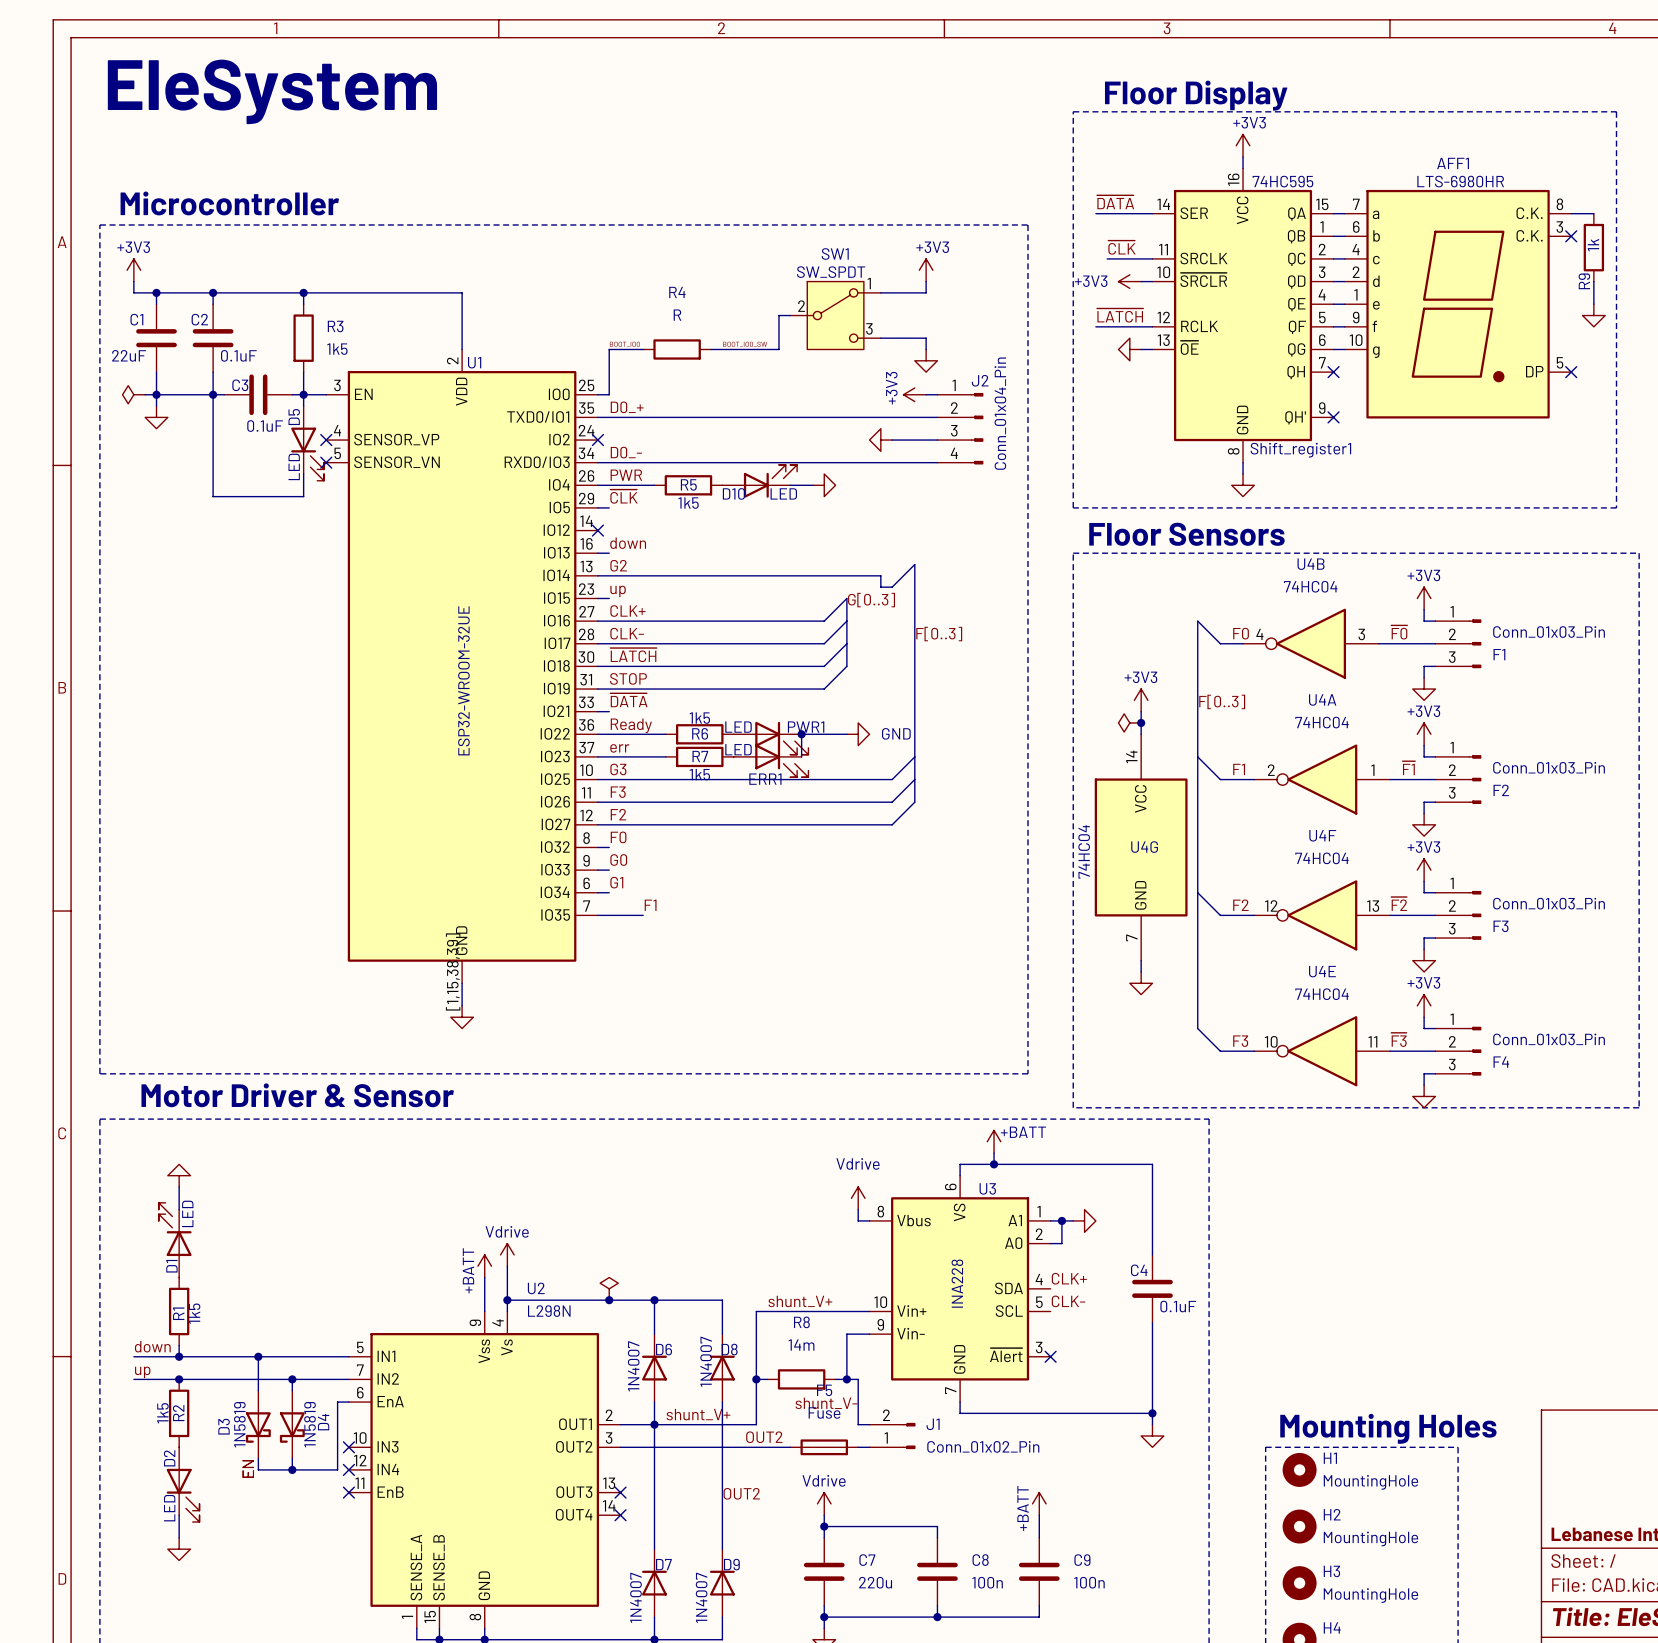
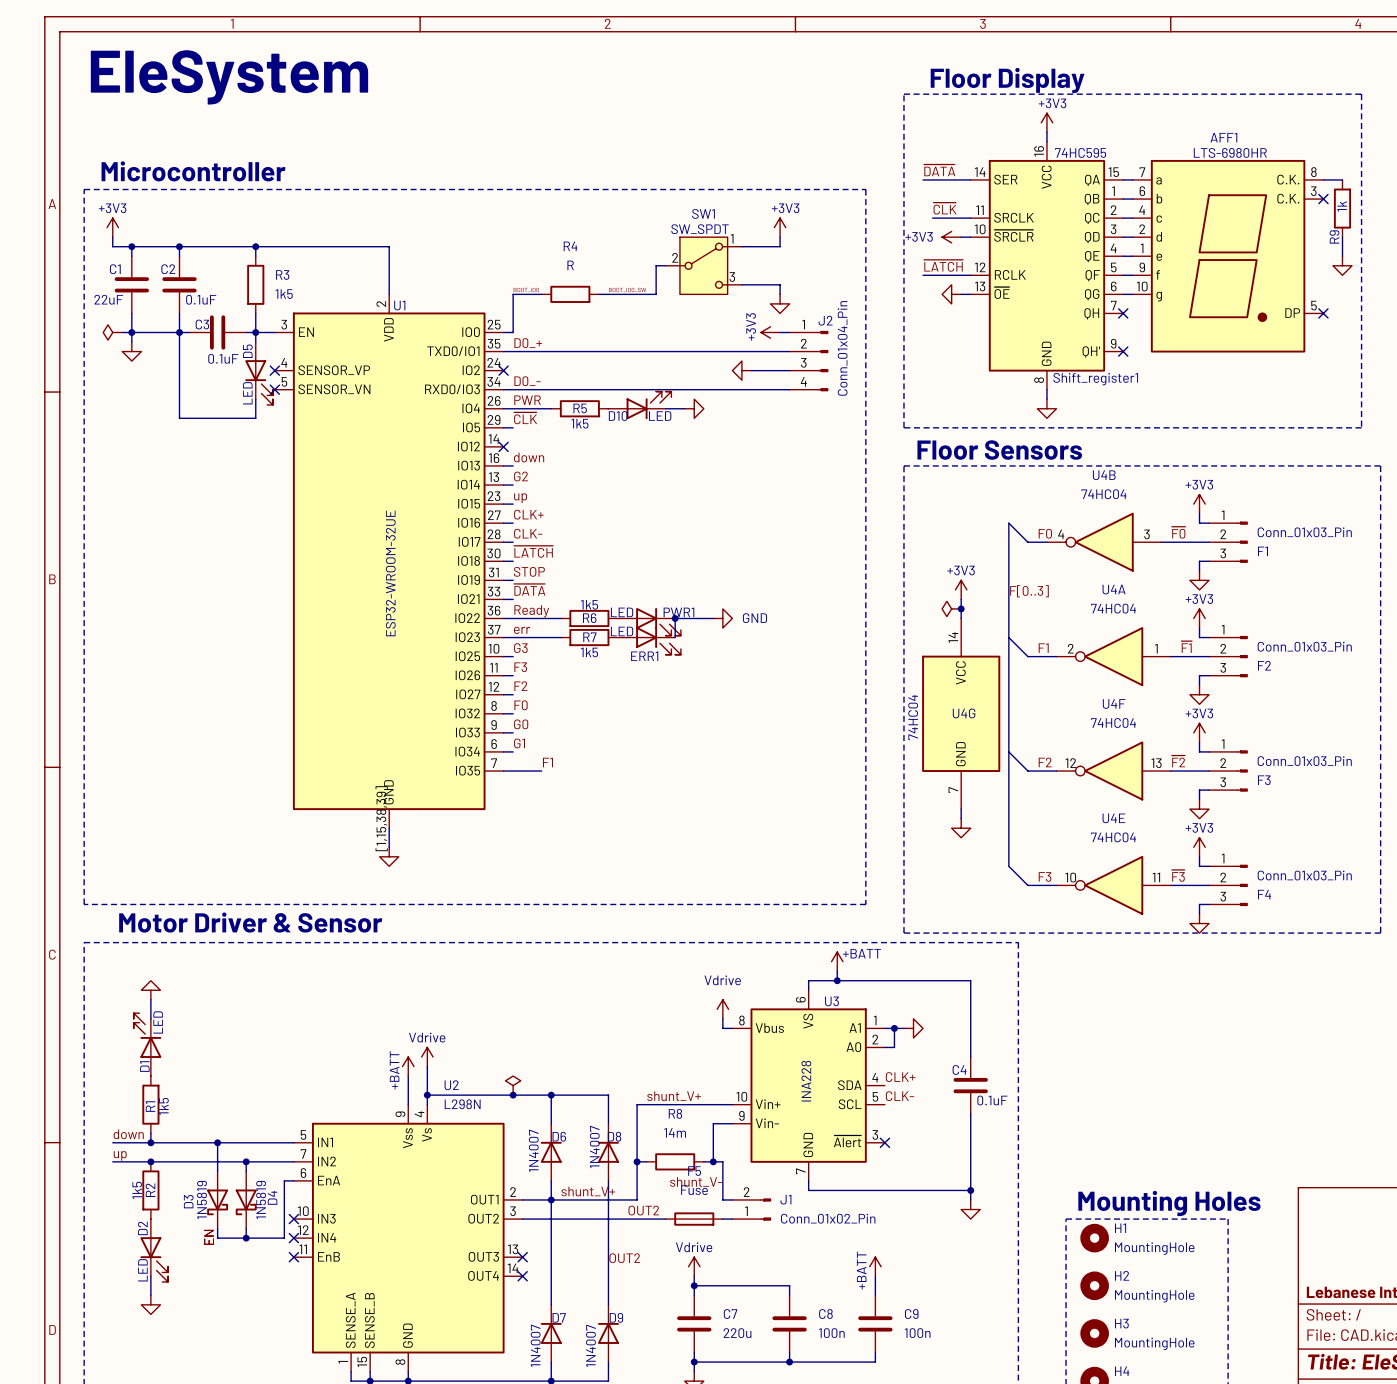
wire: (914, 564) (892, 587) (880, 587) (880, 575) (609, 575) -> none
bus: (914, 564) (914, 802) -> none
wire: (846, 598) (824, 621) (609, 621) -> none
bus: (846, 598) (846, 666) -> none
label: G[0..3] (871, 600) -> none
wire: (846, 621) (824, 643) (609, 643) -> none
label: F[0..3] (939, 634) -> none
wire: (846, 643) (824, 666) (609, 666) -> none
wire: (846, 666) (824, 689) (609, 689) -> none
wire: (914, 756) (892, 779) (609, 779) -> none
wire: (914, 779) (892, 802) (609, 802) -> none
wire: (914, 802) (892, 824) (609, 824) -> none

